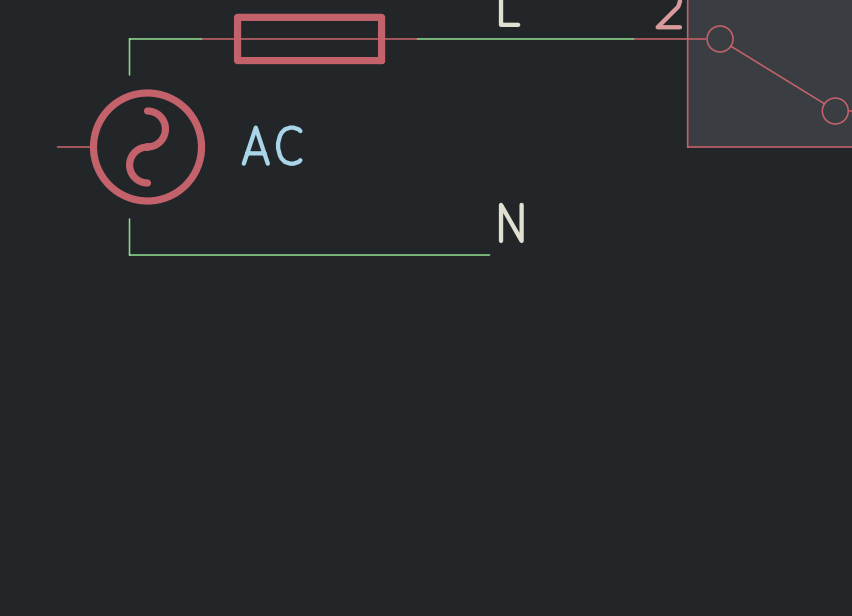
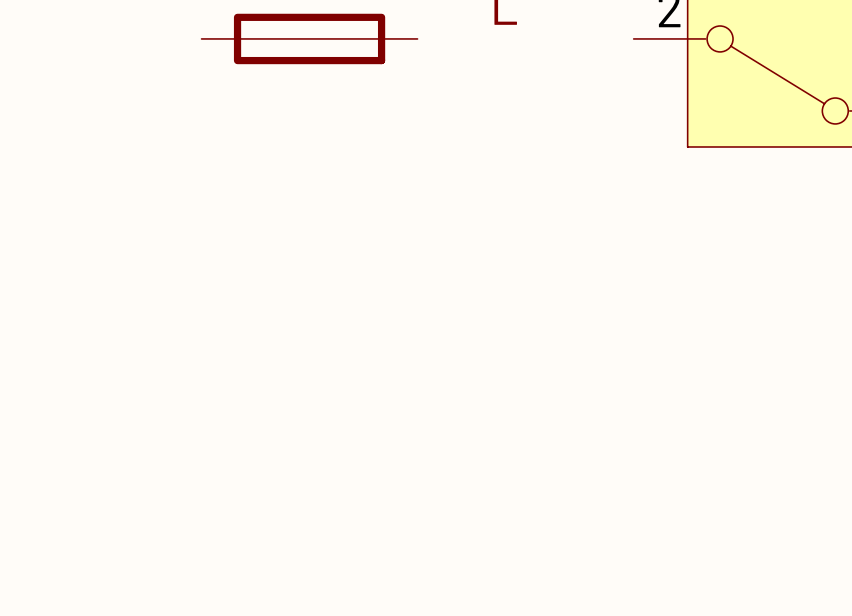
wire: (201, 38) (129, 38) (129, 74) -> none
wire: (417, 38) (633, 38) -> none
power symbol: AC (131, 146) -> none
wire: (129, 219) (129, 255) (489, 255) -> none
label: N (511, 222) -> none

